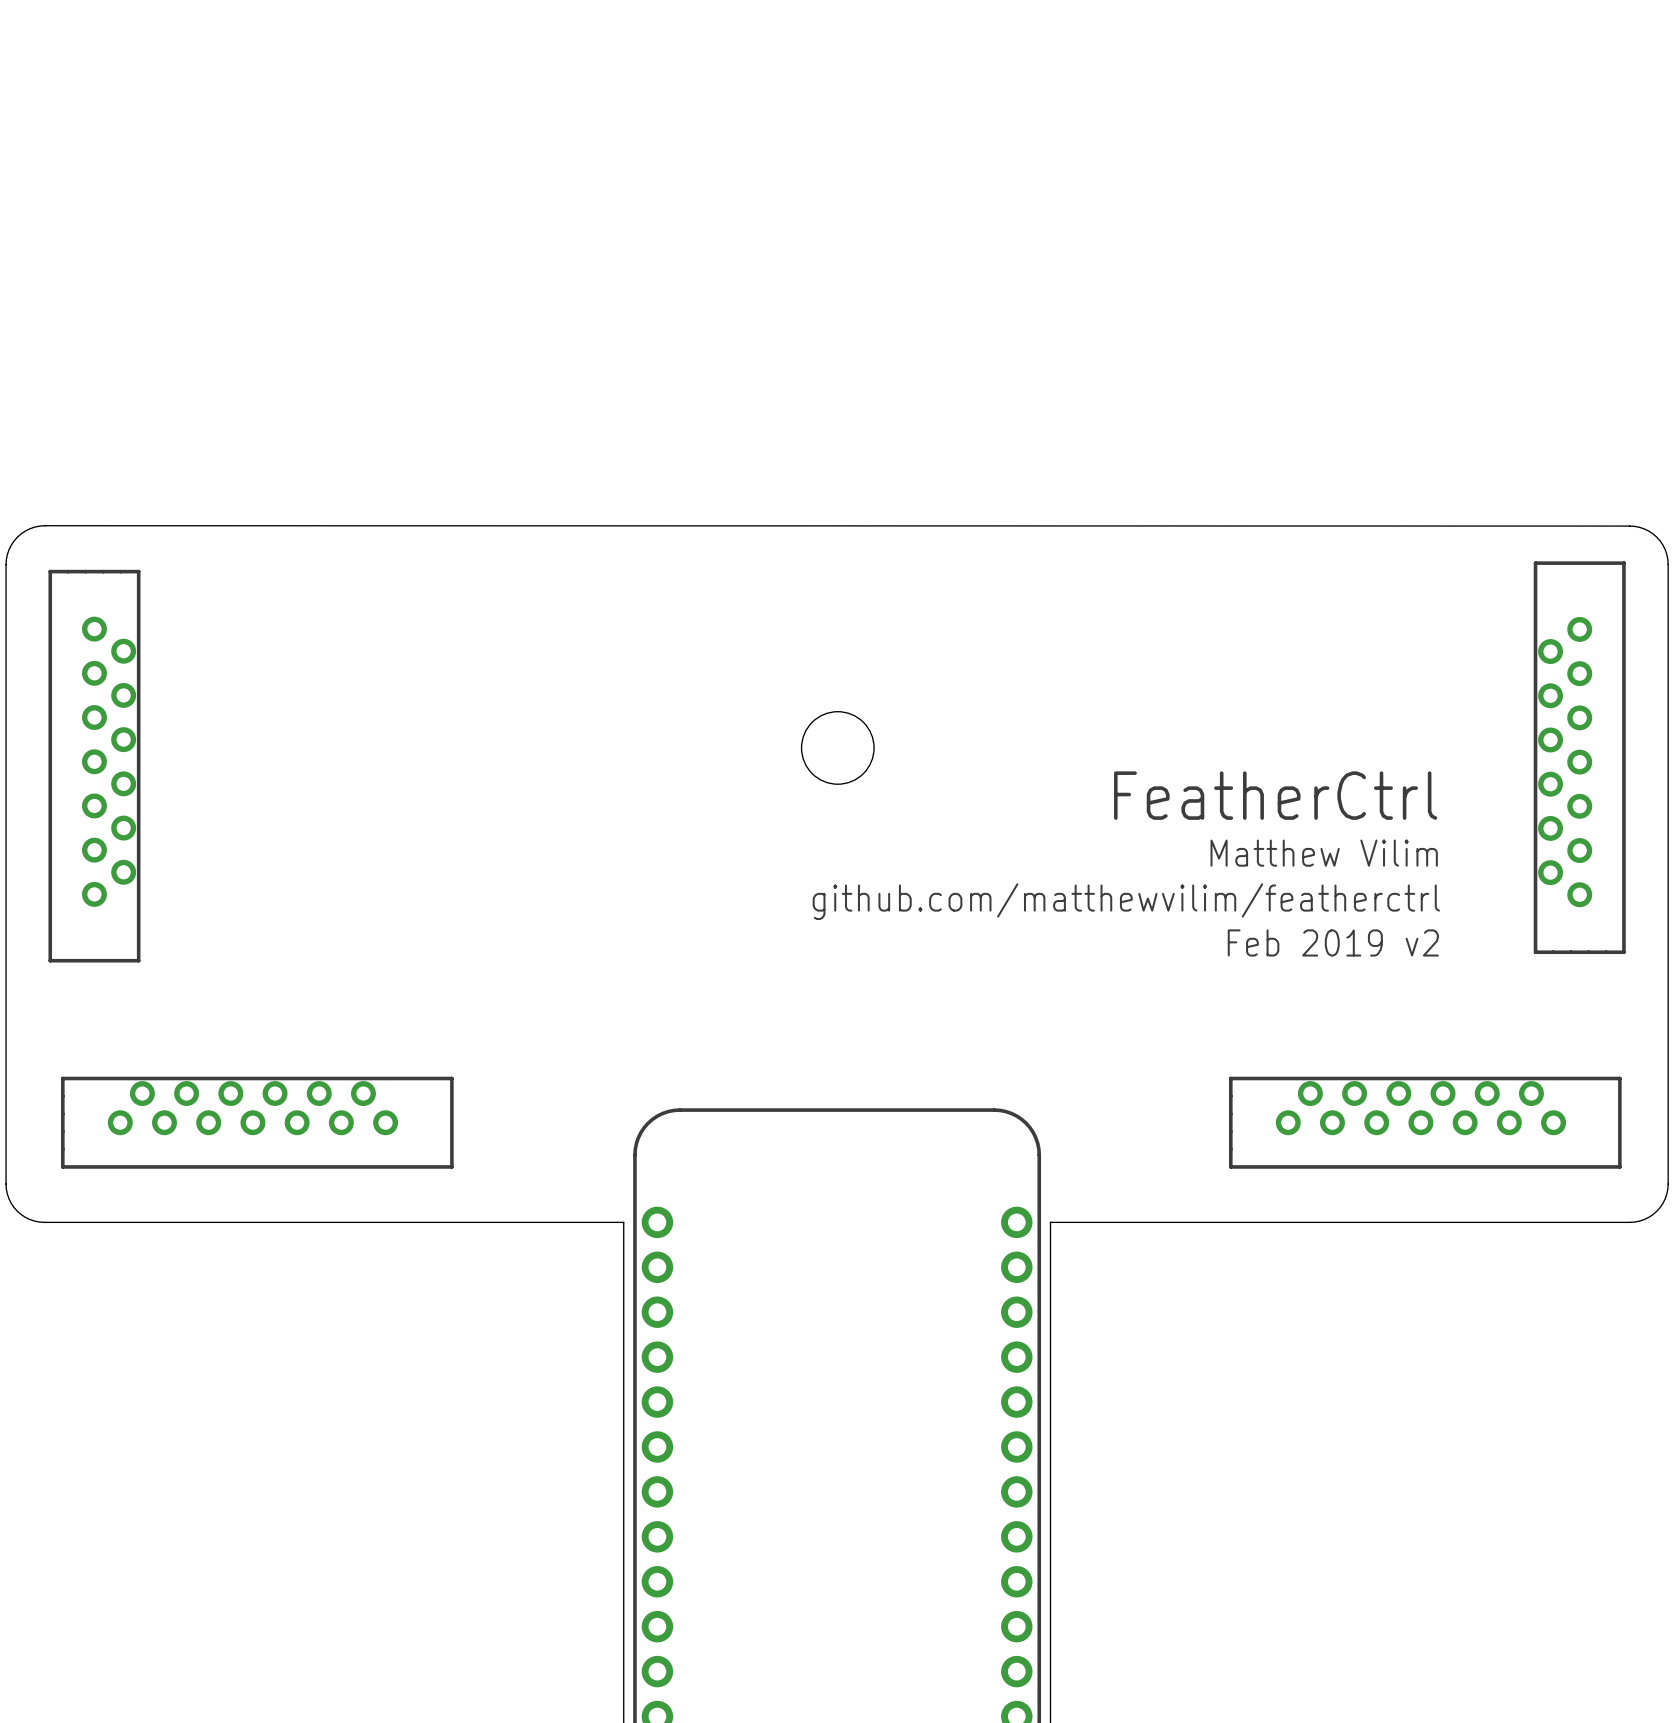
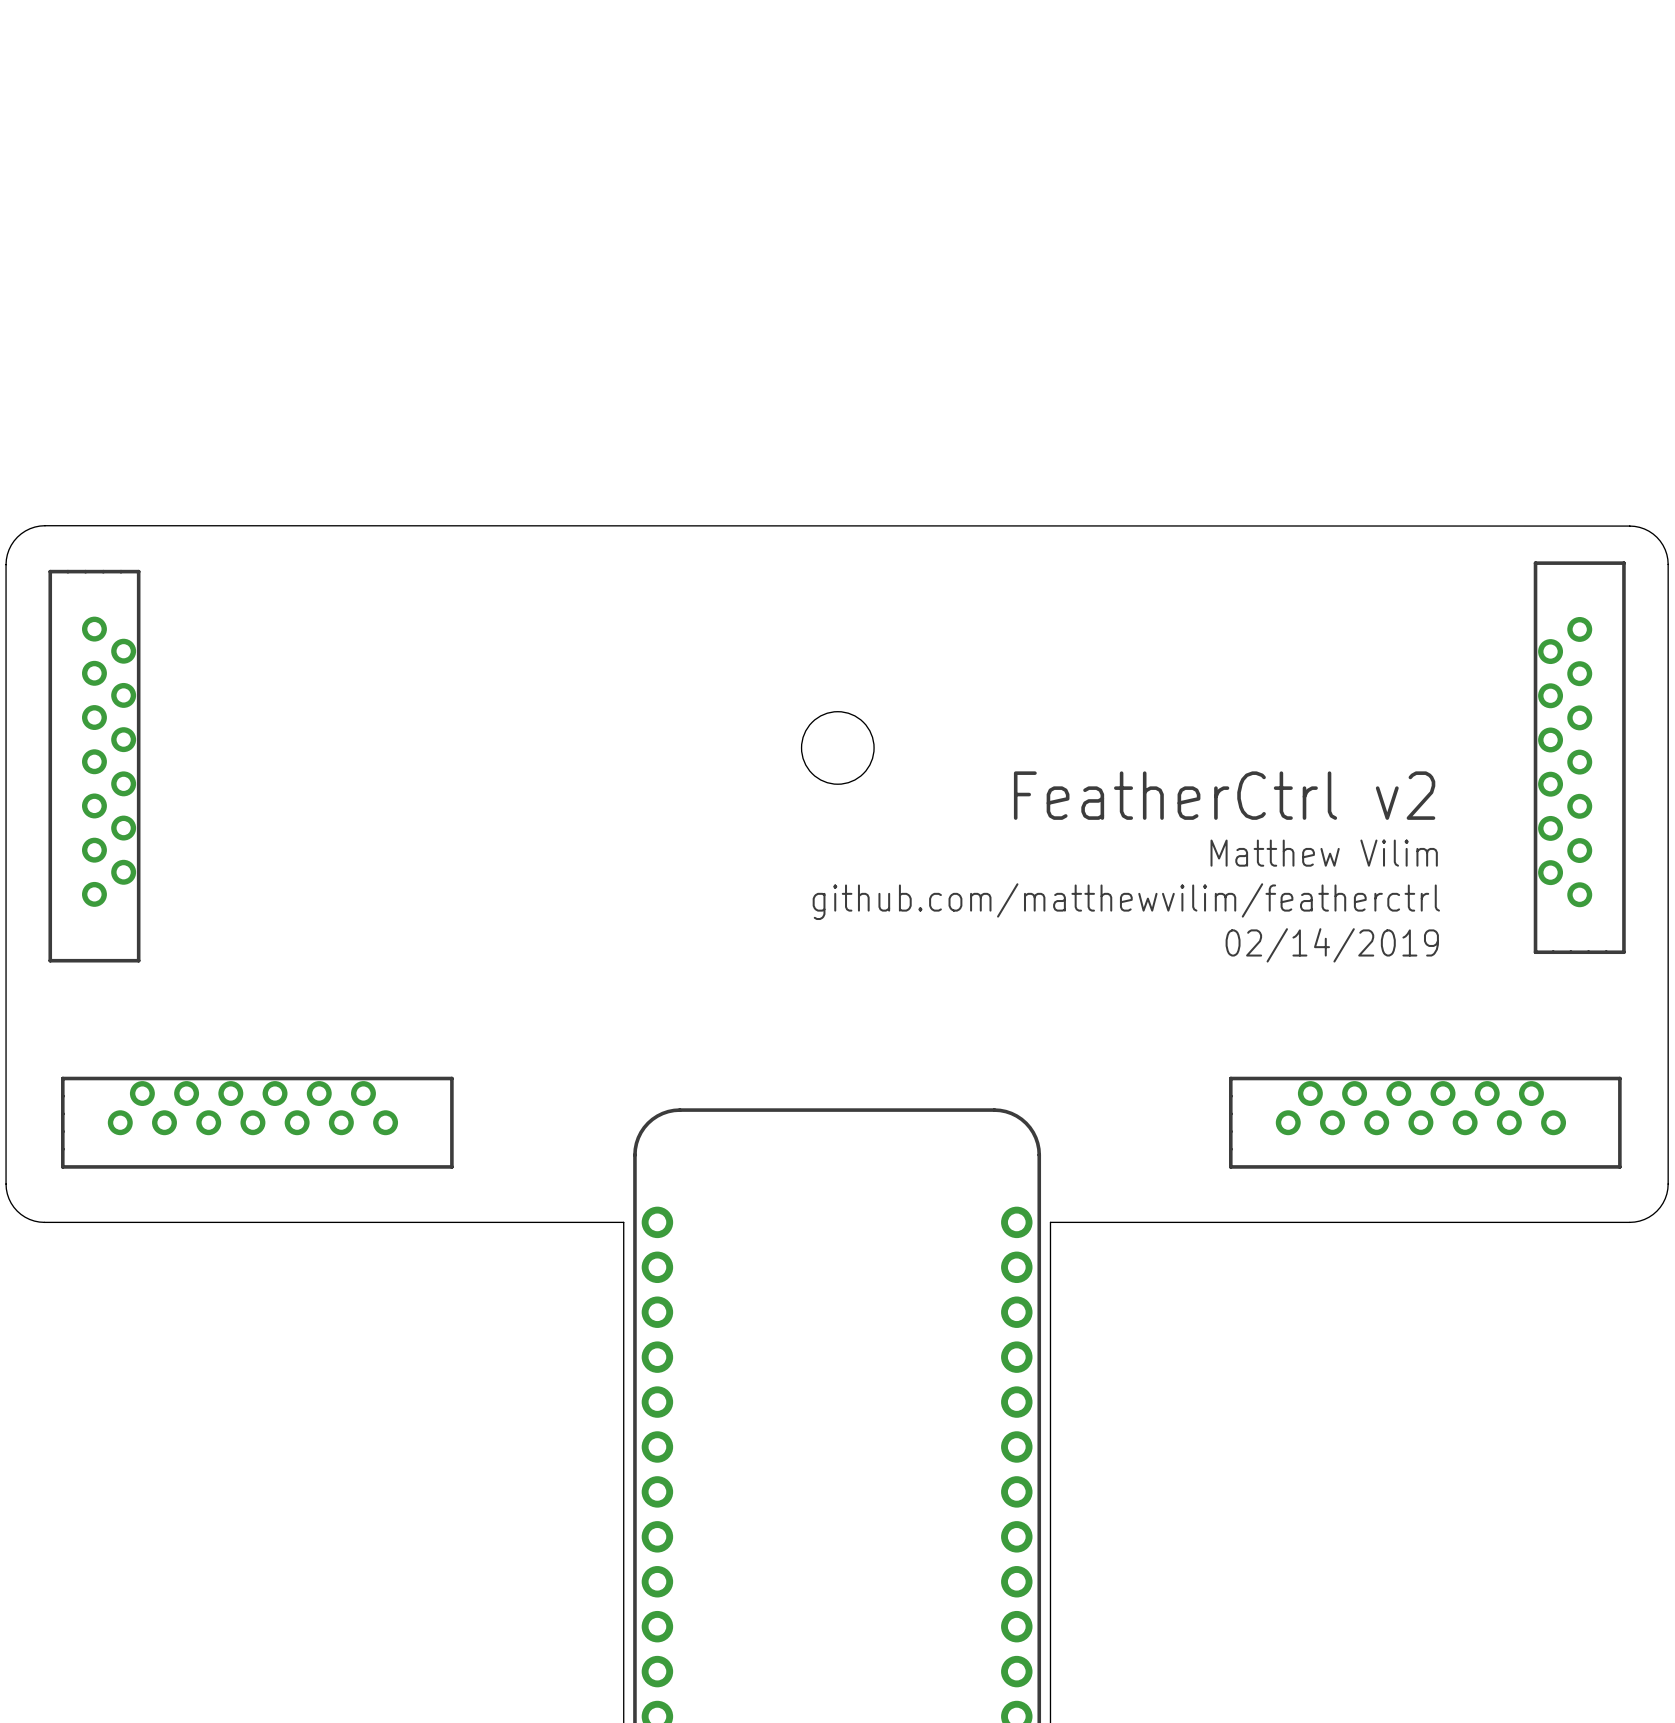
text: FeatherCtrl (1275, 795) -> FeatherCtrl v2 (1224, 795)
text: Feb 2019 v2 (1333, 942) -> 02/14/2019 (1332, 945)

